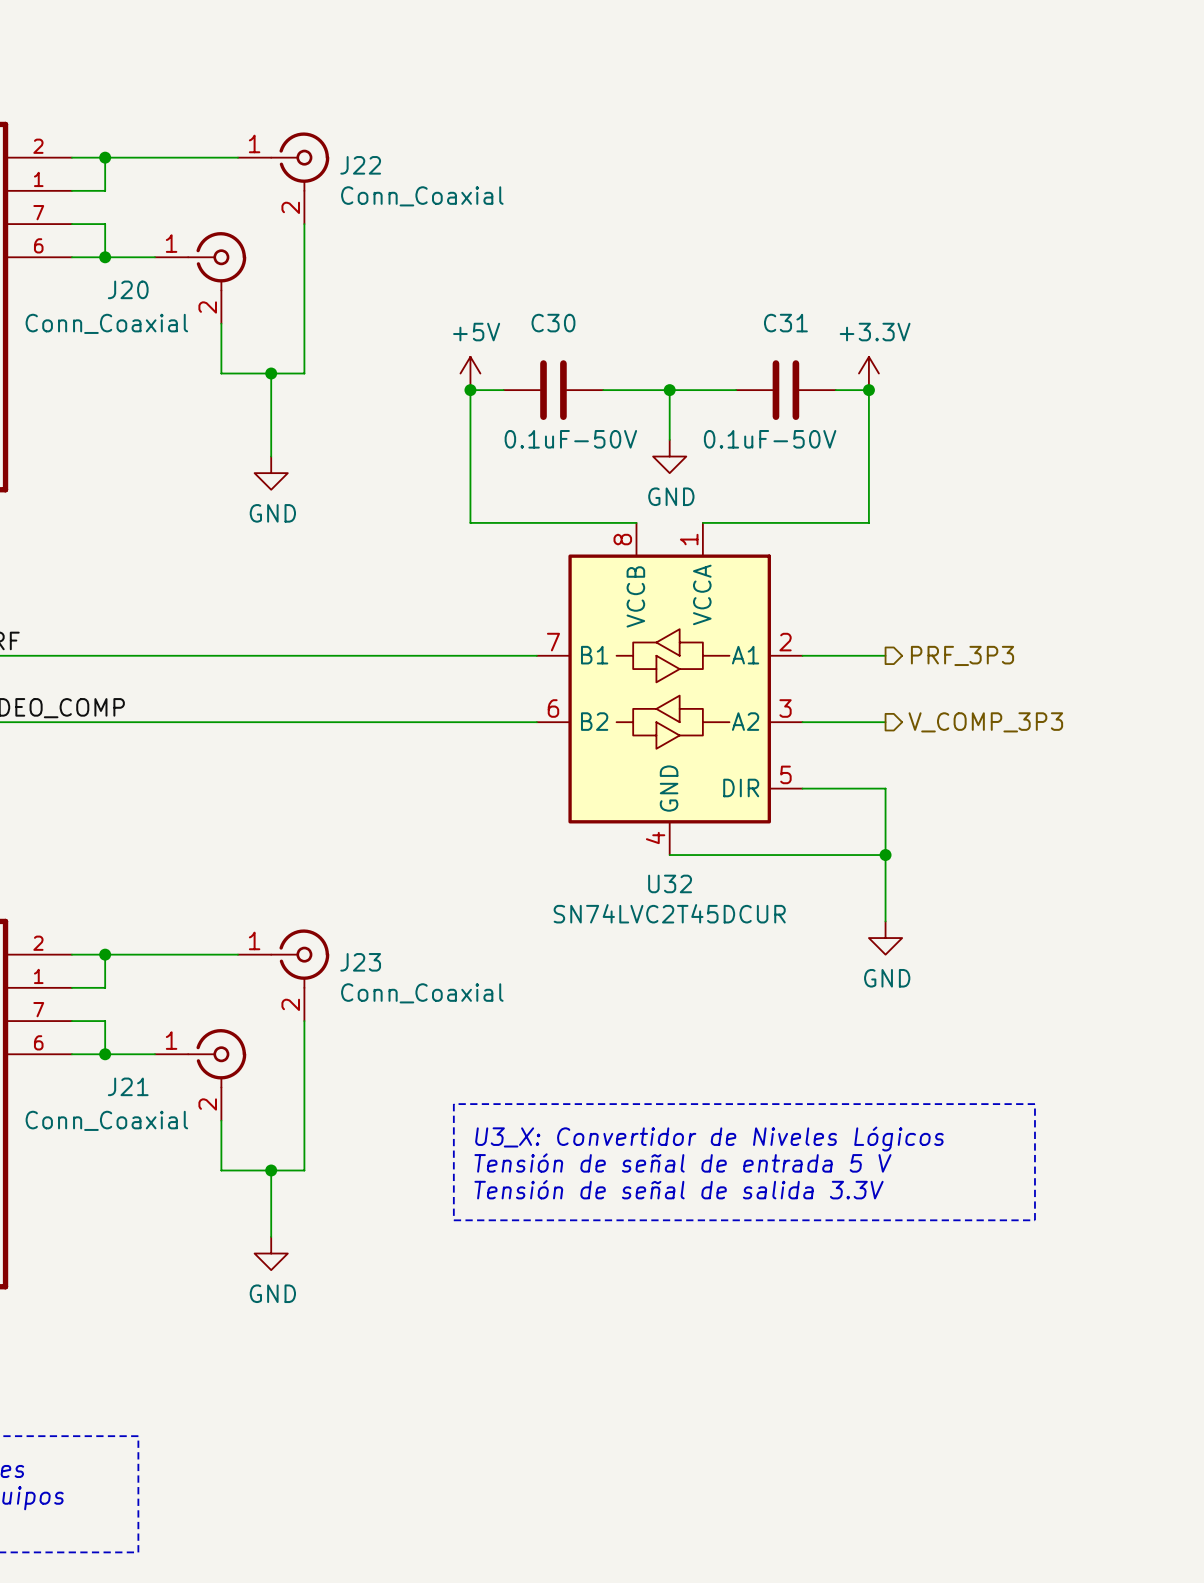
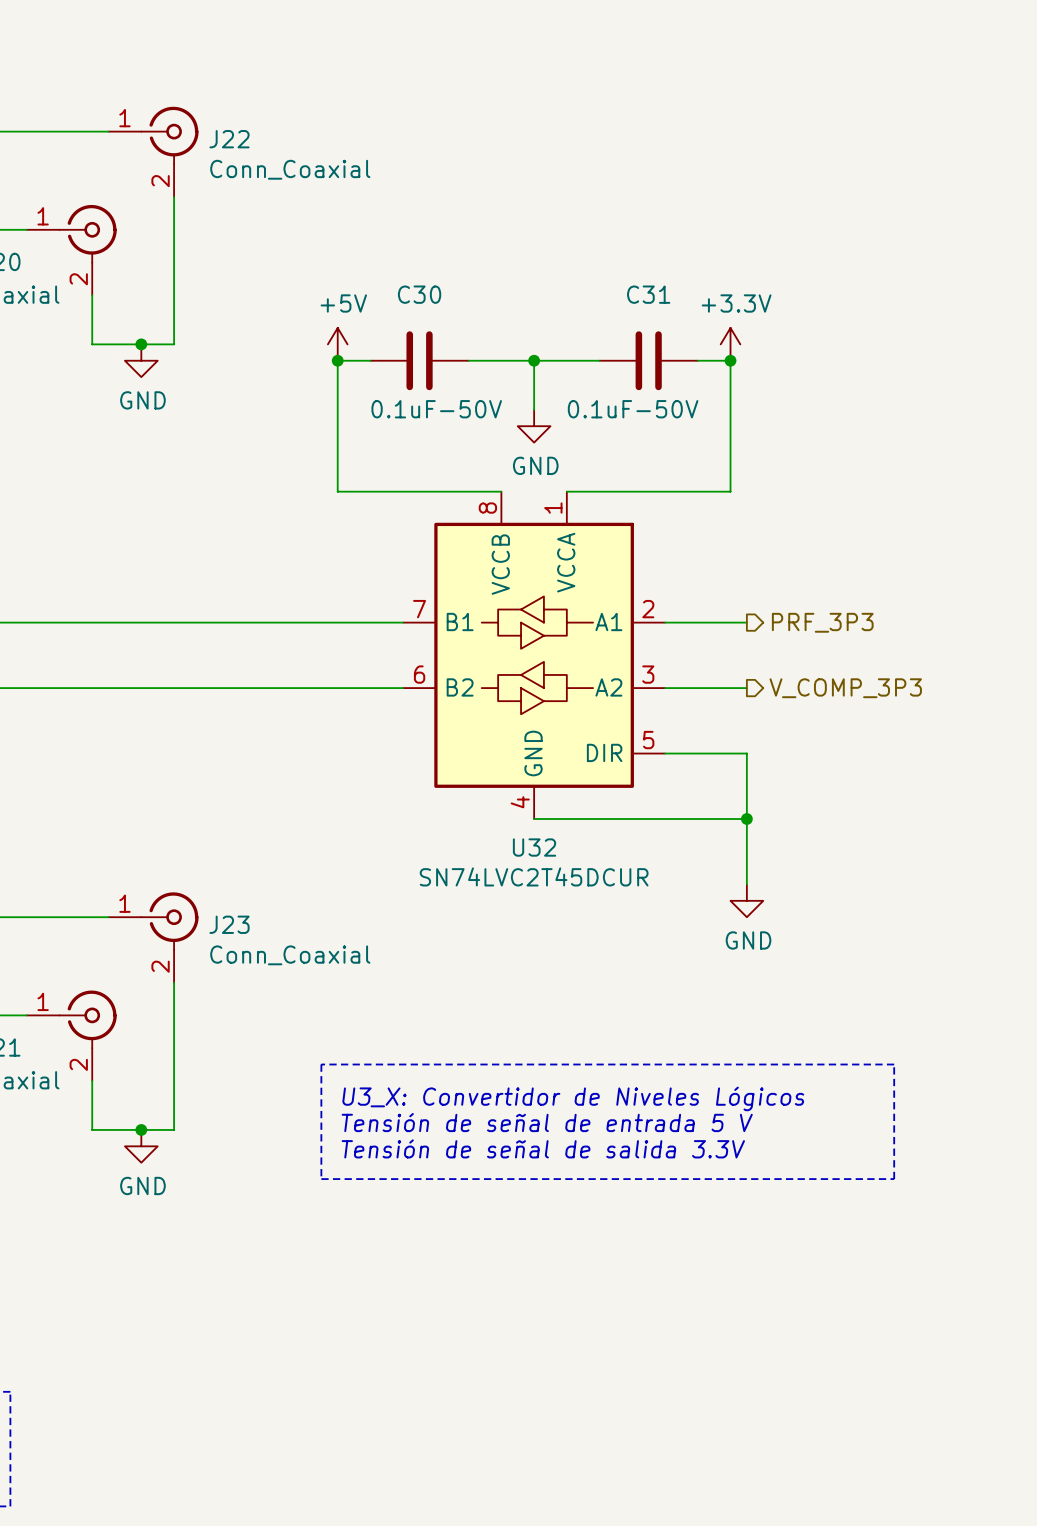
wire: (271, 373) (271, 456) -> none
power symbol position: GND (271, 473) -> GND (141, 360)
wire: (271, 1170) (271, 1236) -> none
power symbol position: GND (271, 1253) -> GND (141, 1146)

